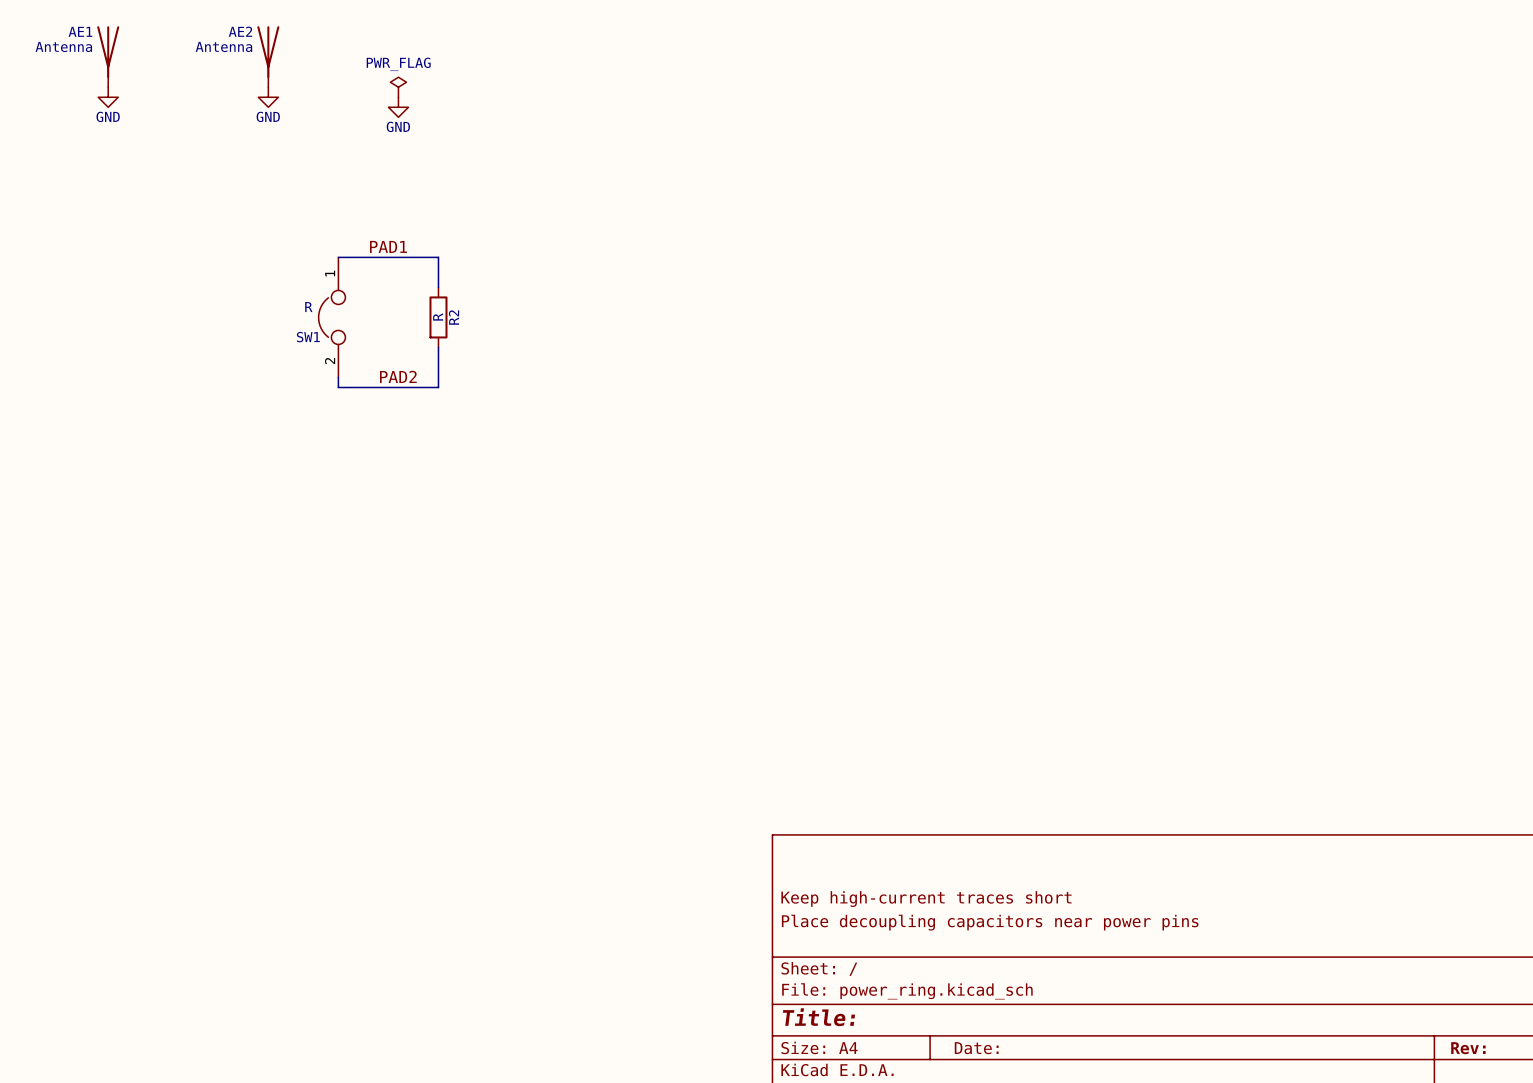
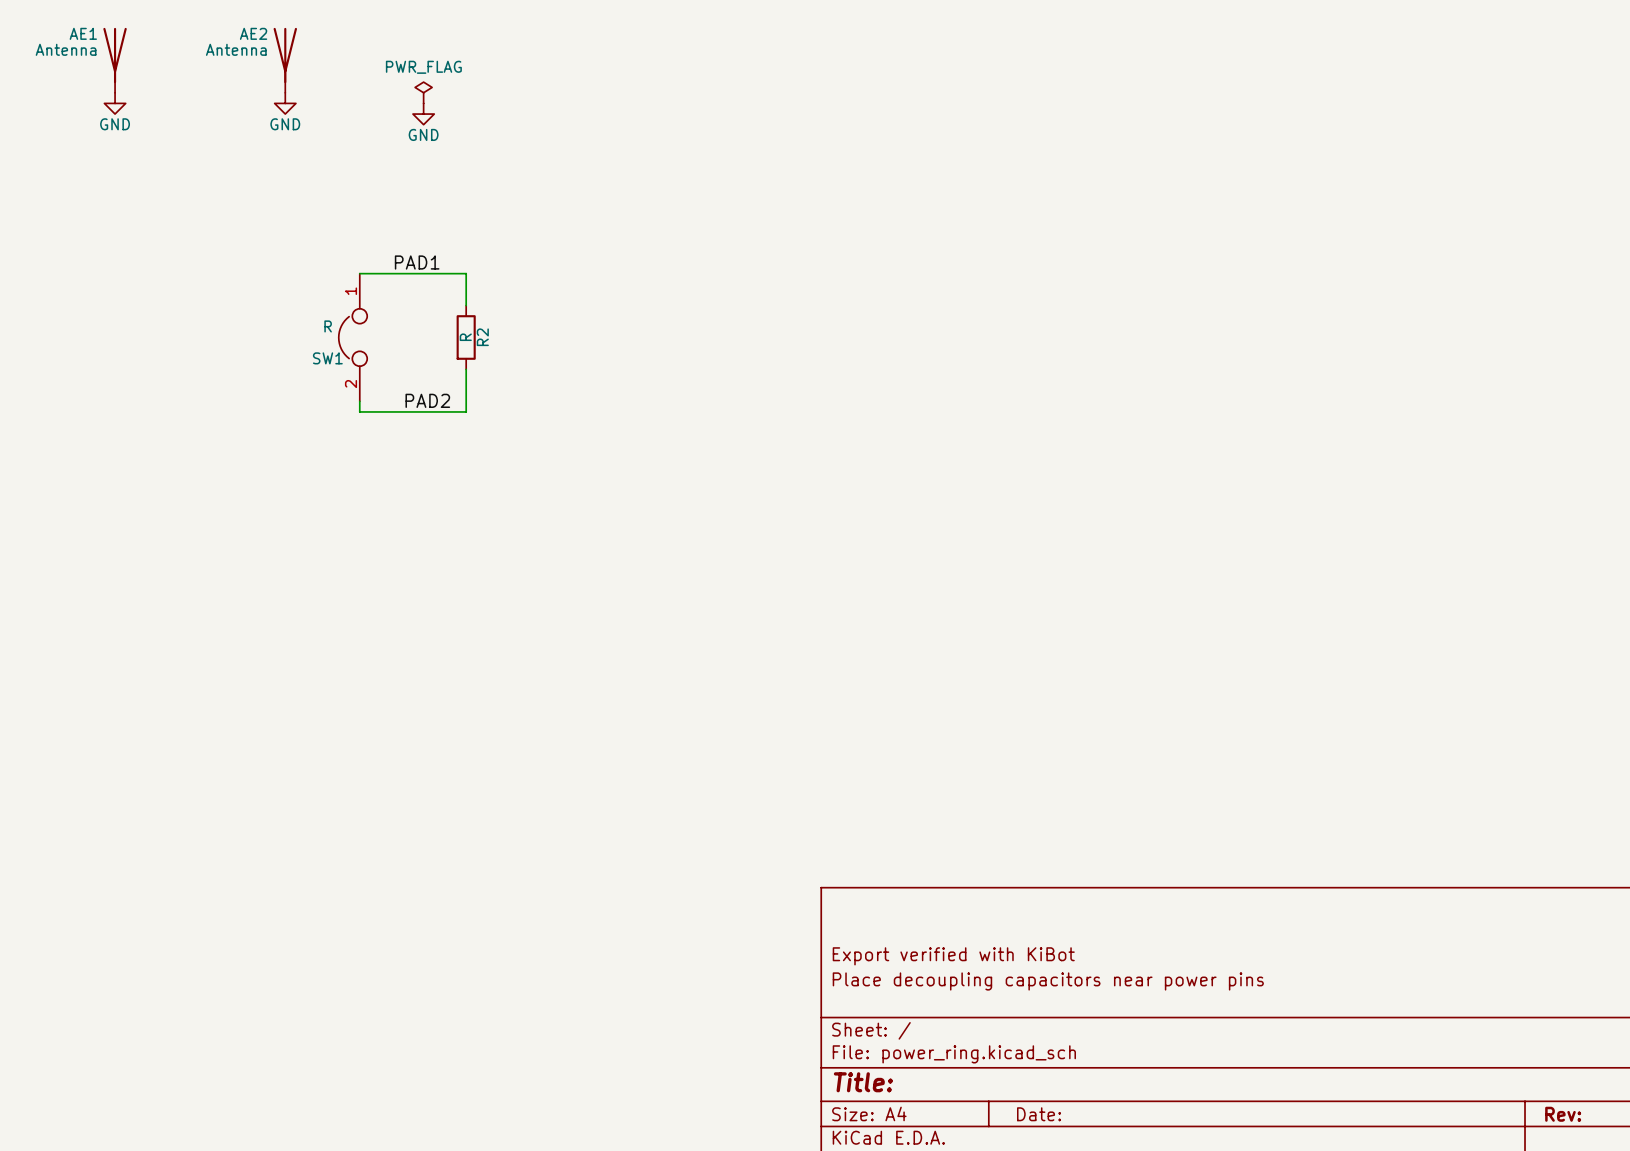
title block: Keep high-current traces short (926, 899) -> Export verified with KiBot (953, 956)

